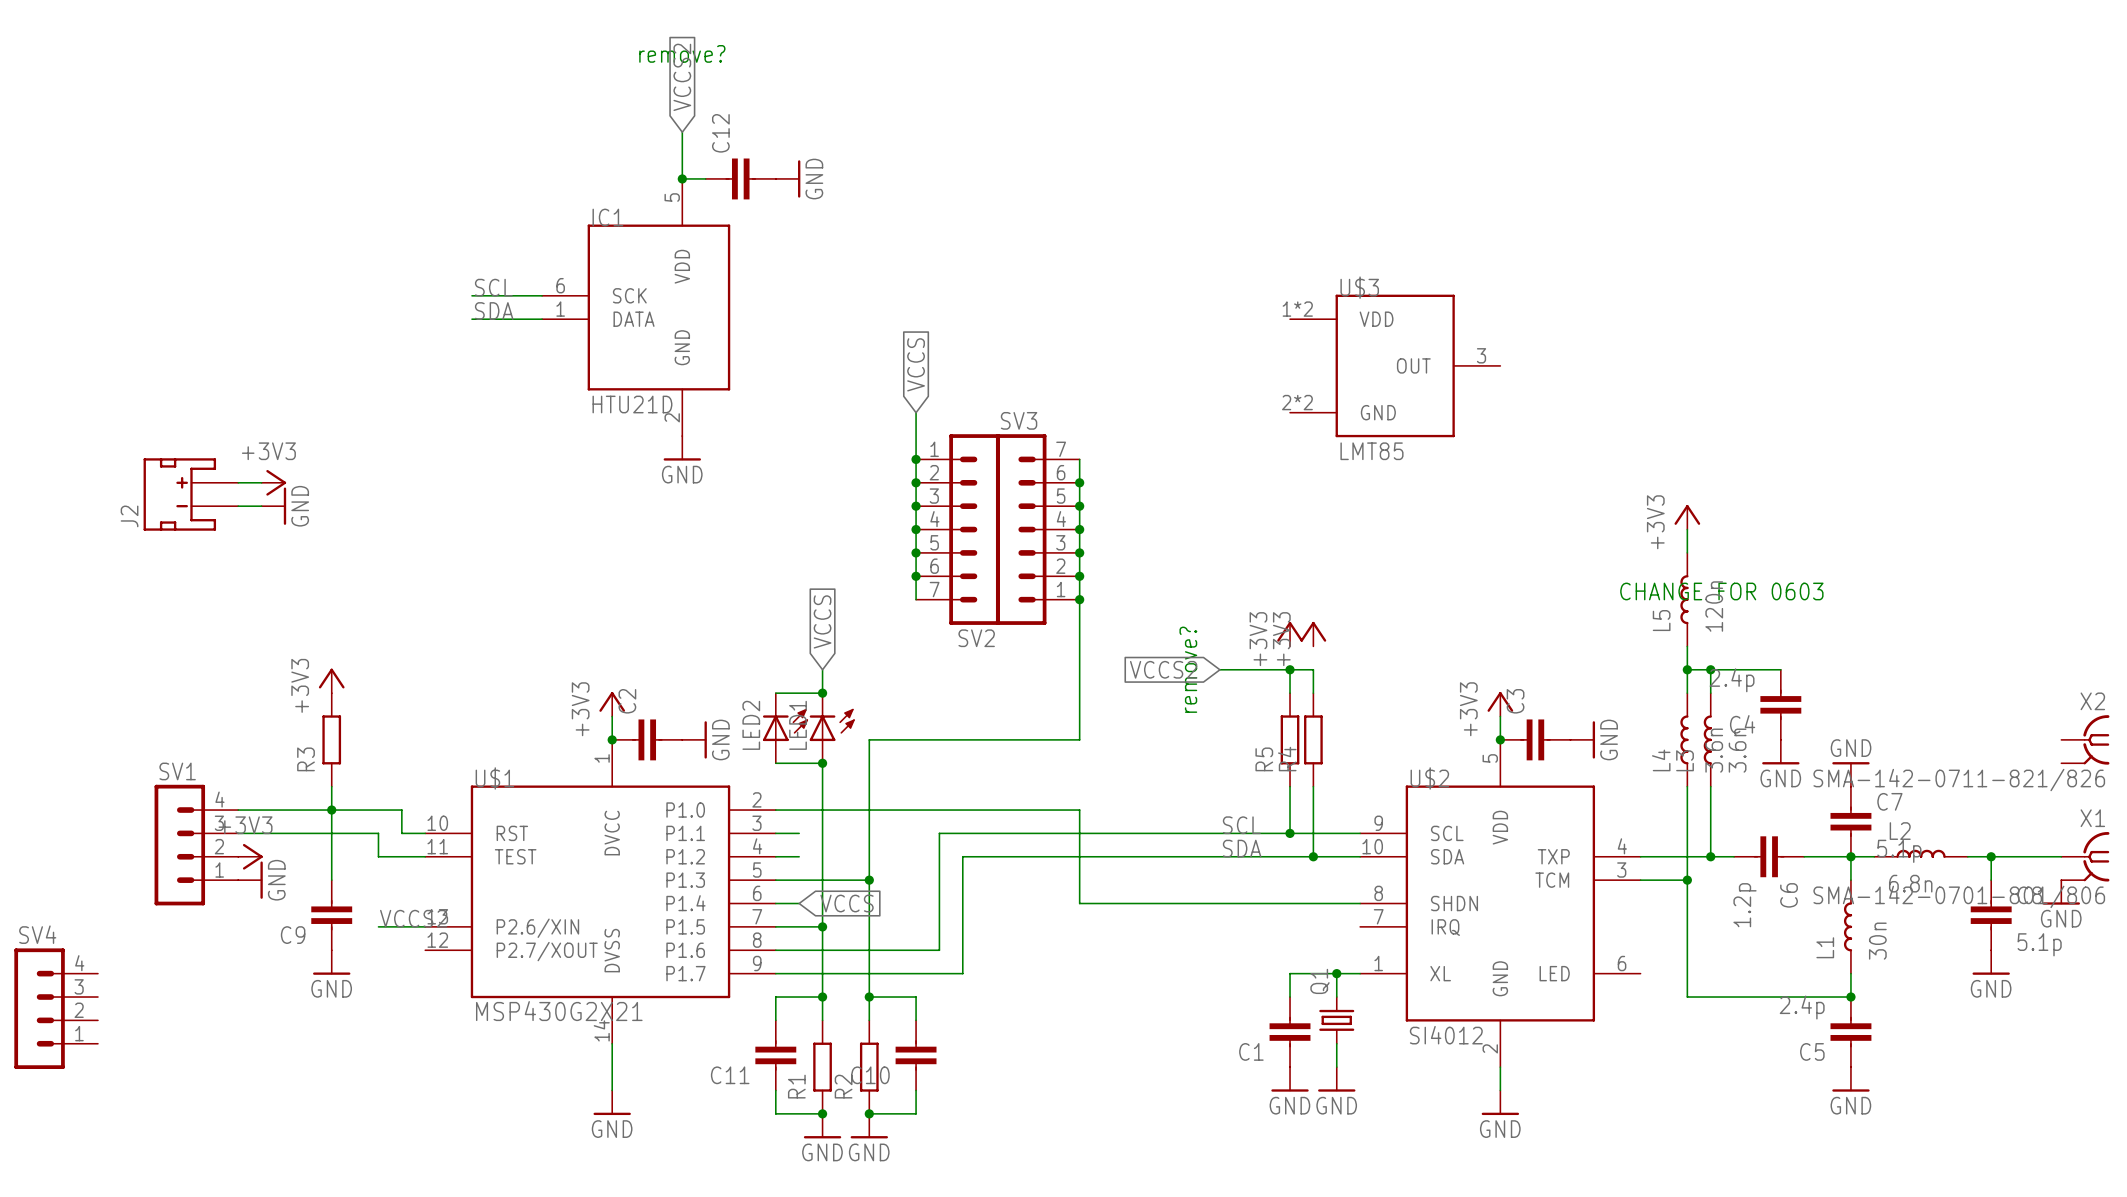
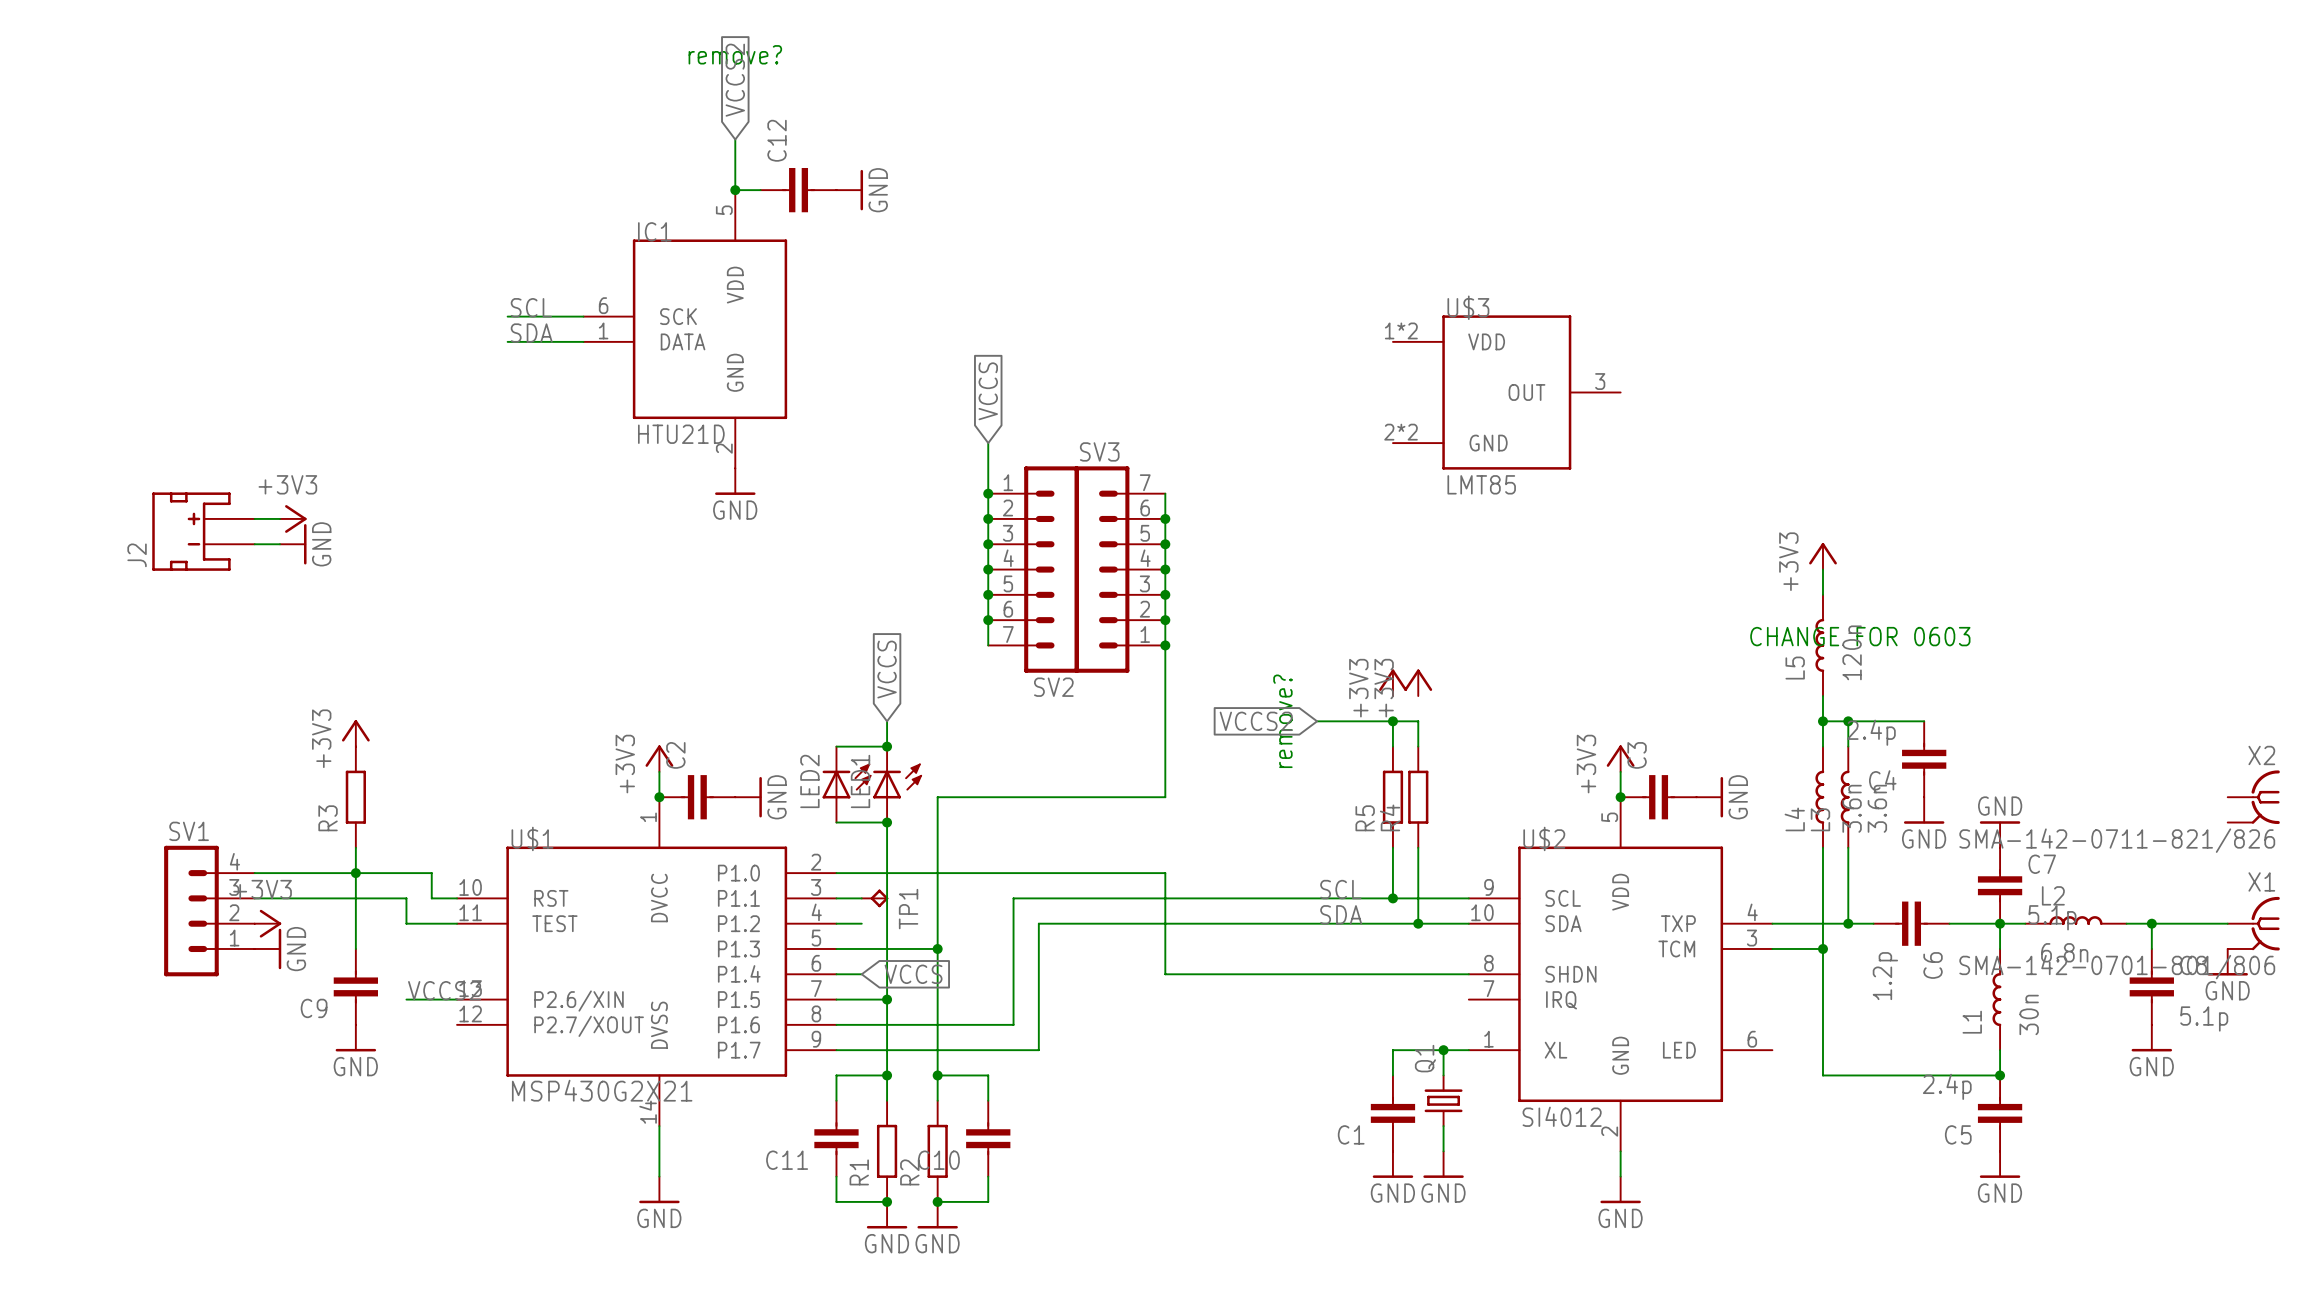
TP1: none -> (875, 898)
SV4: (56, 1008) -> none

